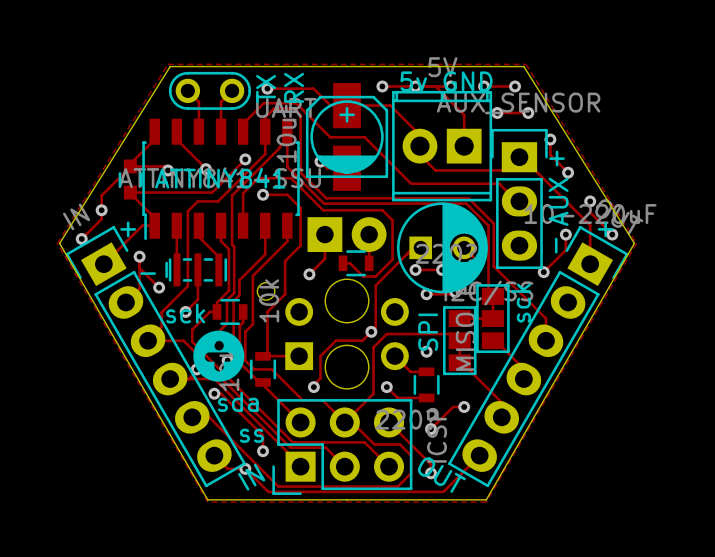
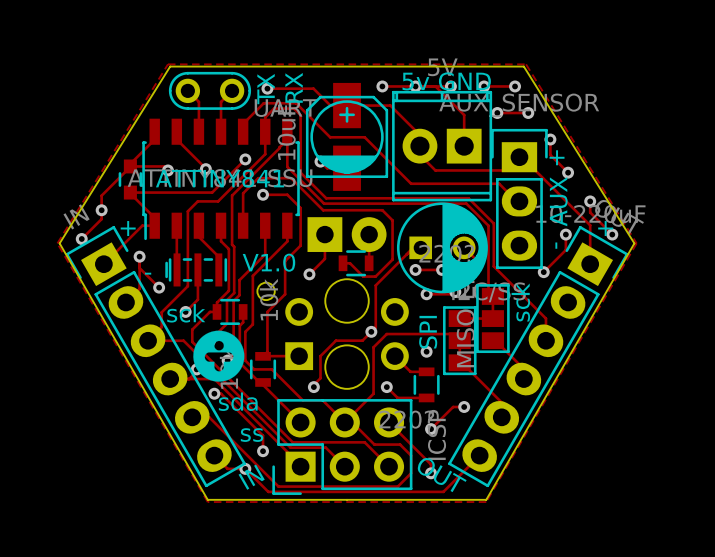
text: none -> V1.0 (268, 262)

